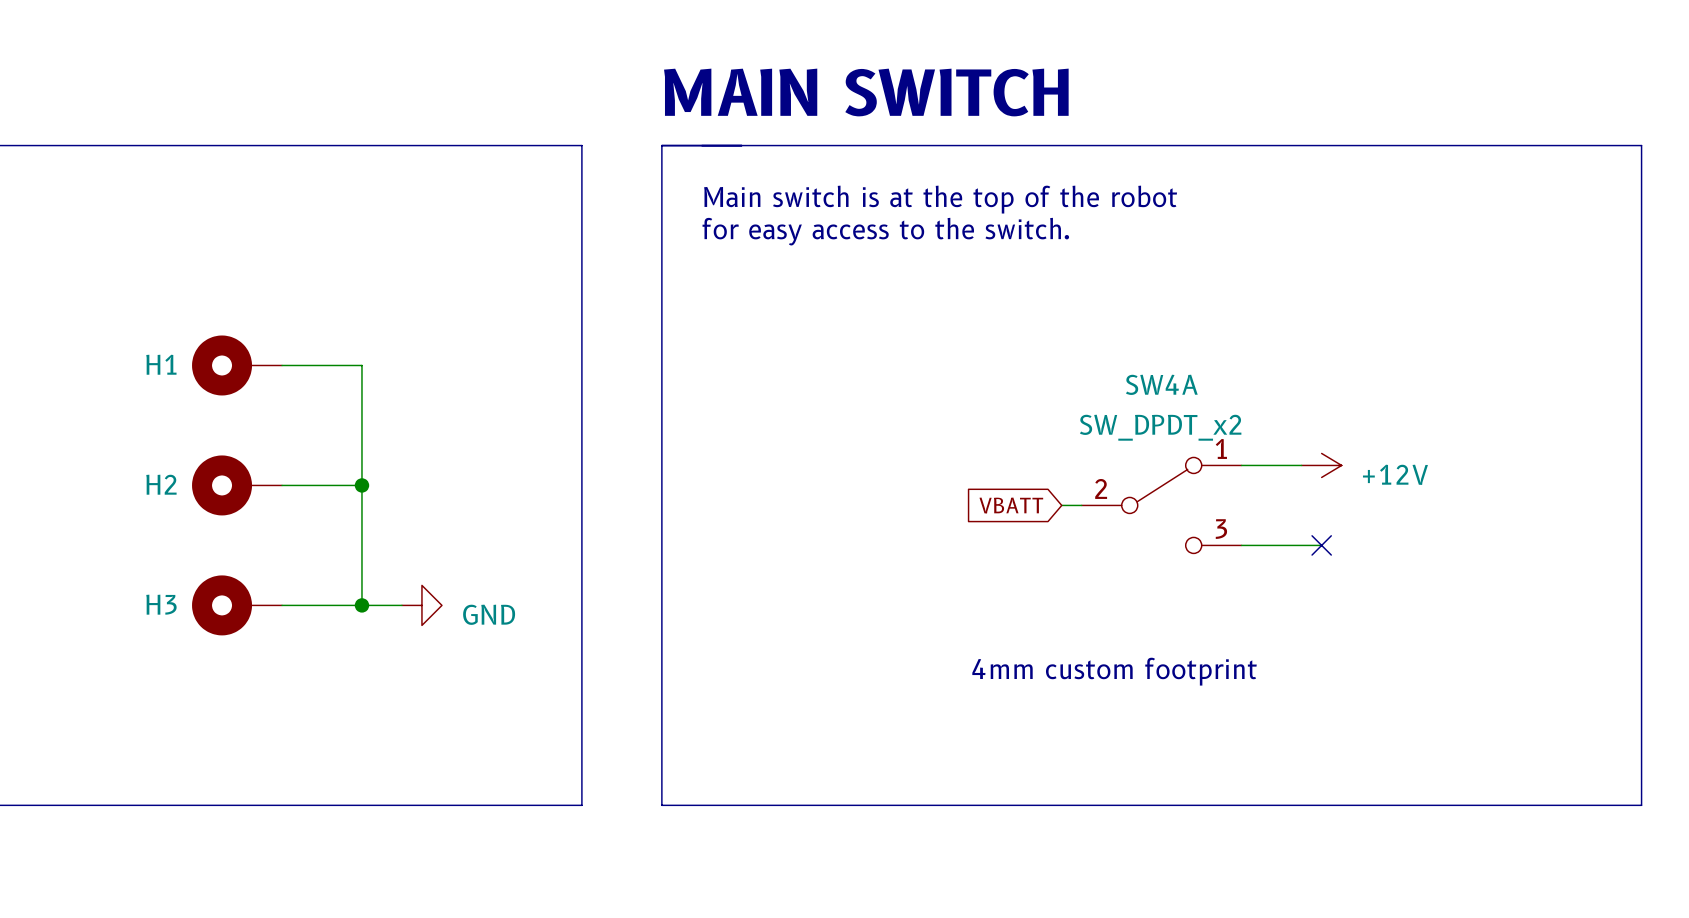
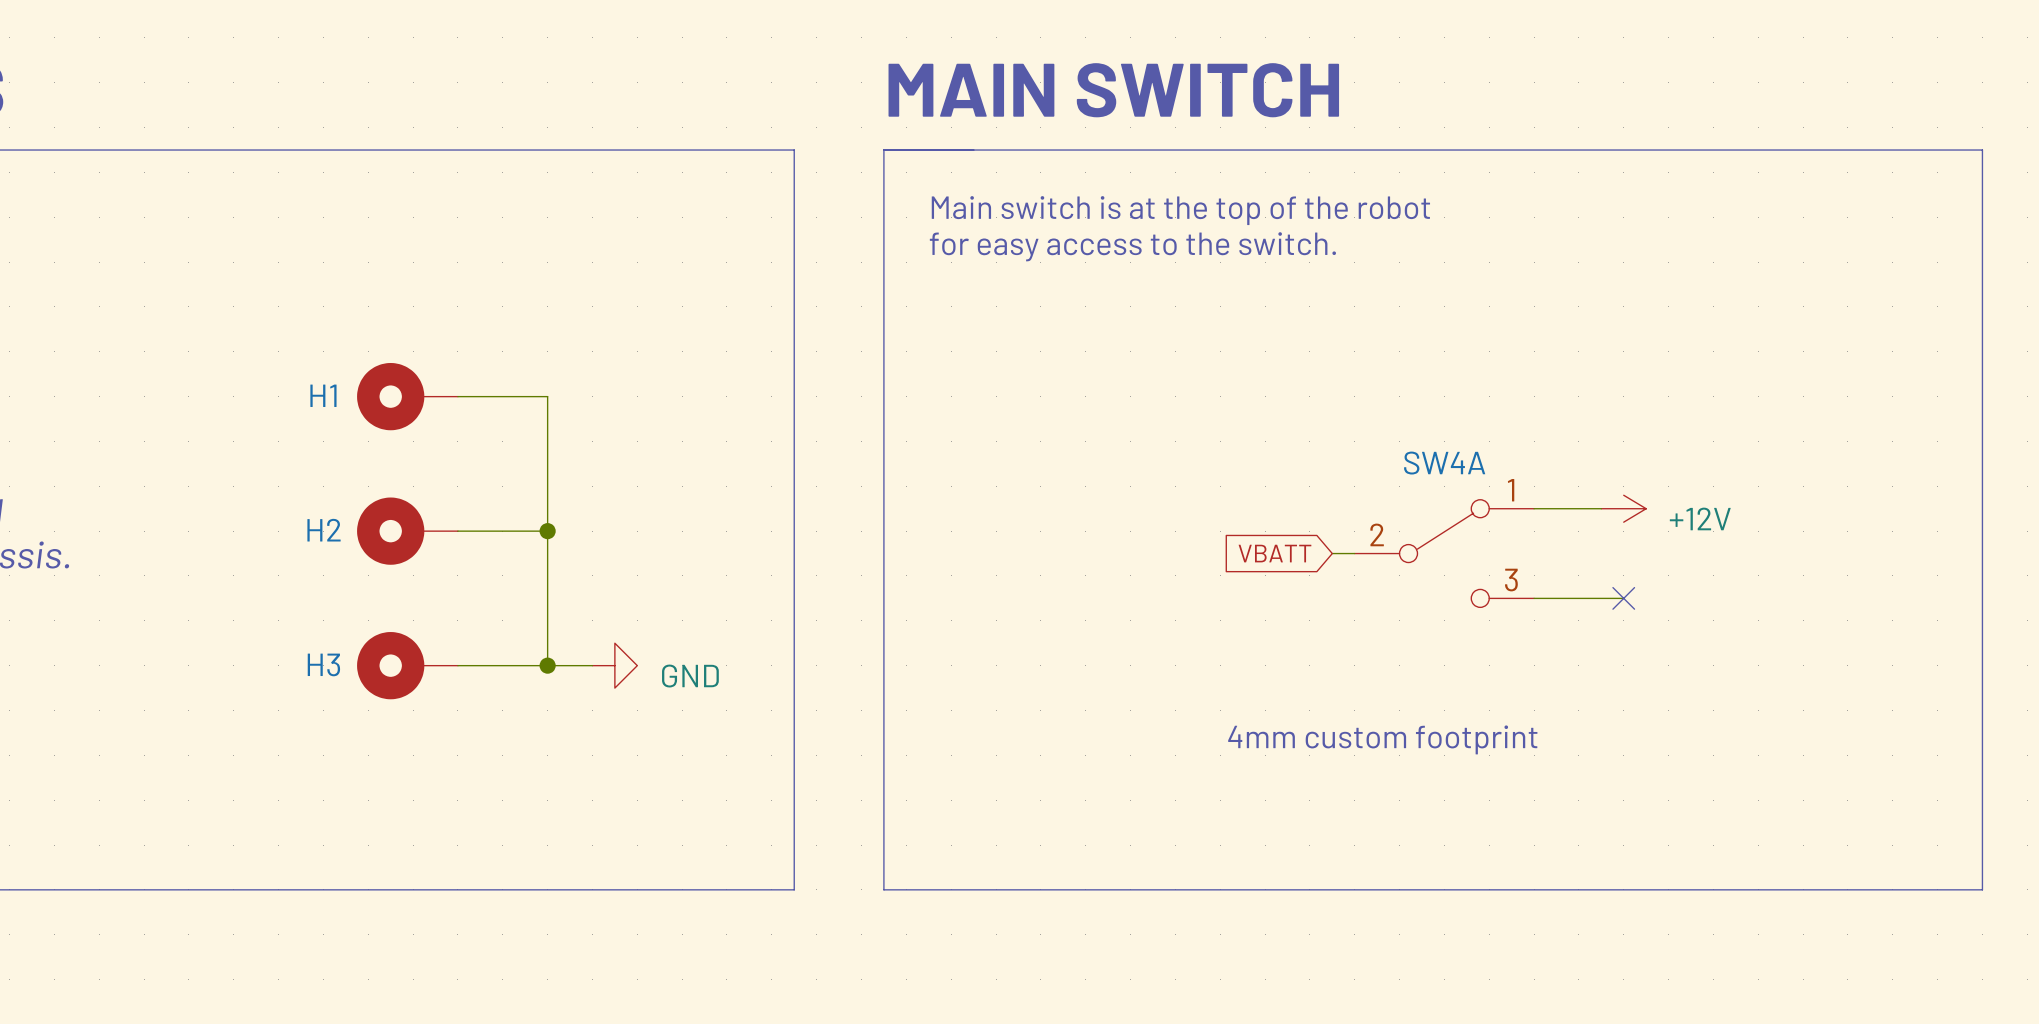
SW4A name position: SW4A (1161, 384) -> SW4A (1444, 463)
SW4A value: SW_DPDT_x2 (1160, 427) -> none

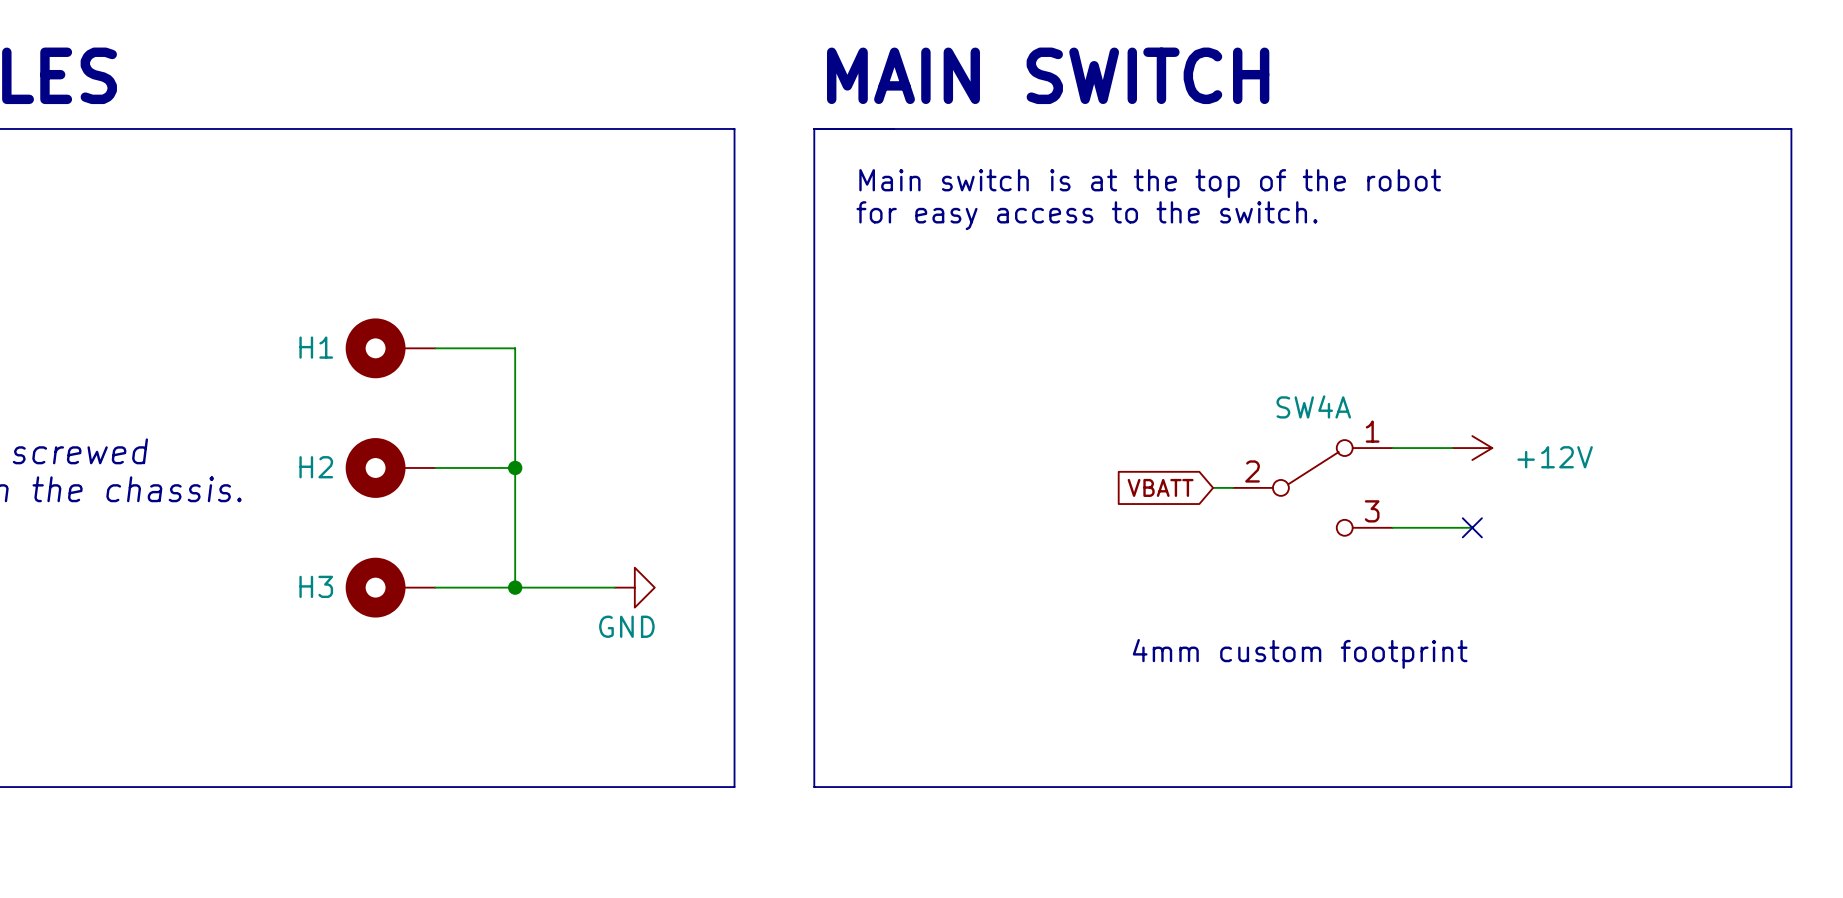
wire: none -> (555, 587) (614, 587)
power symbol position: GND (614, 665) -> GND (634, 587)
power symbol text position: GND (690, 676) -> GND (626, 626)

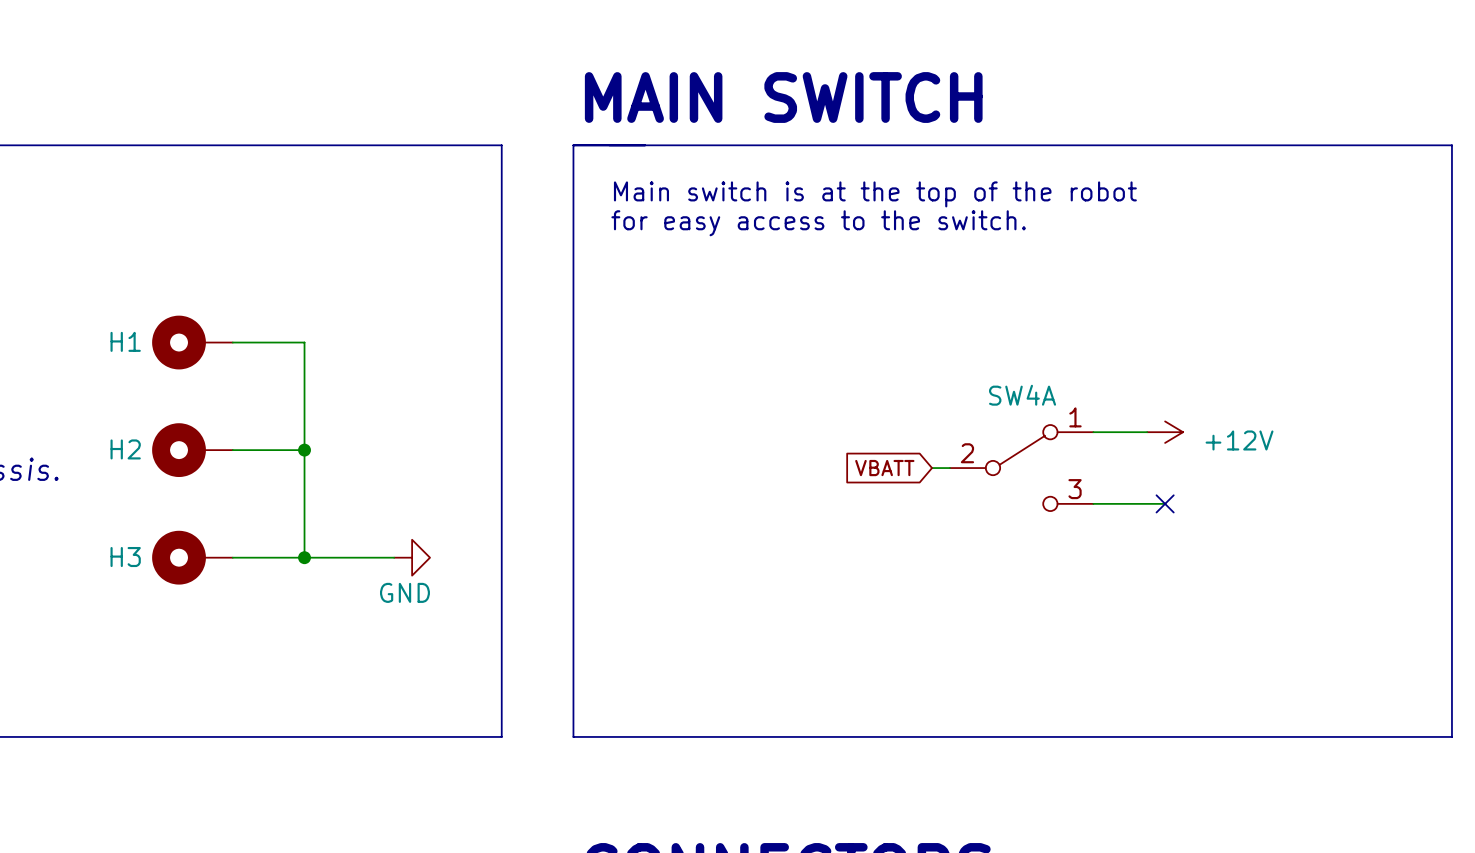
text: 4mm custom footprint (1300, 653) -> none

